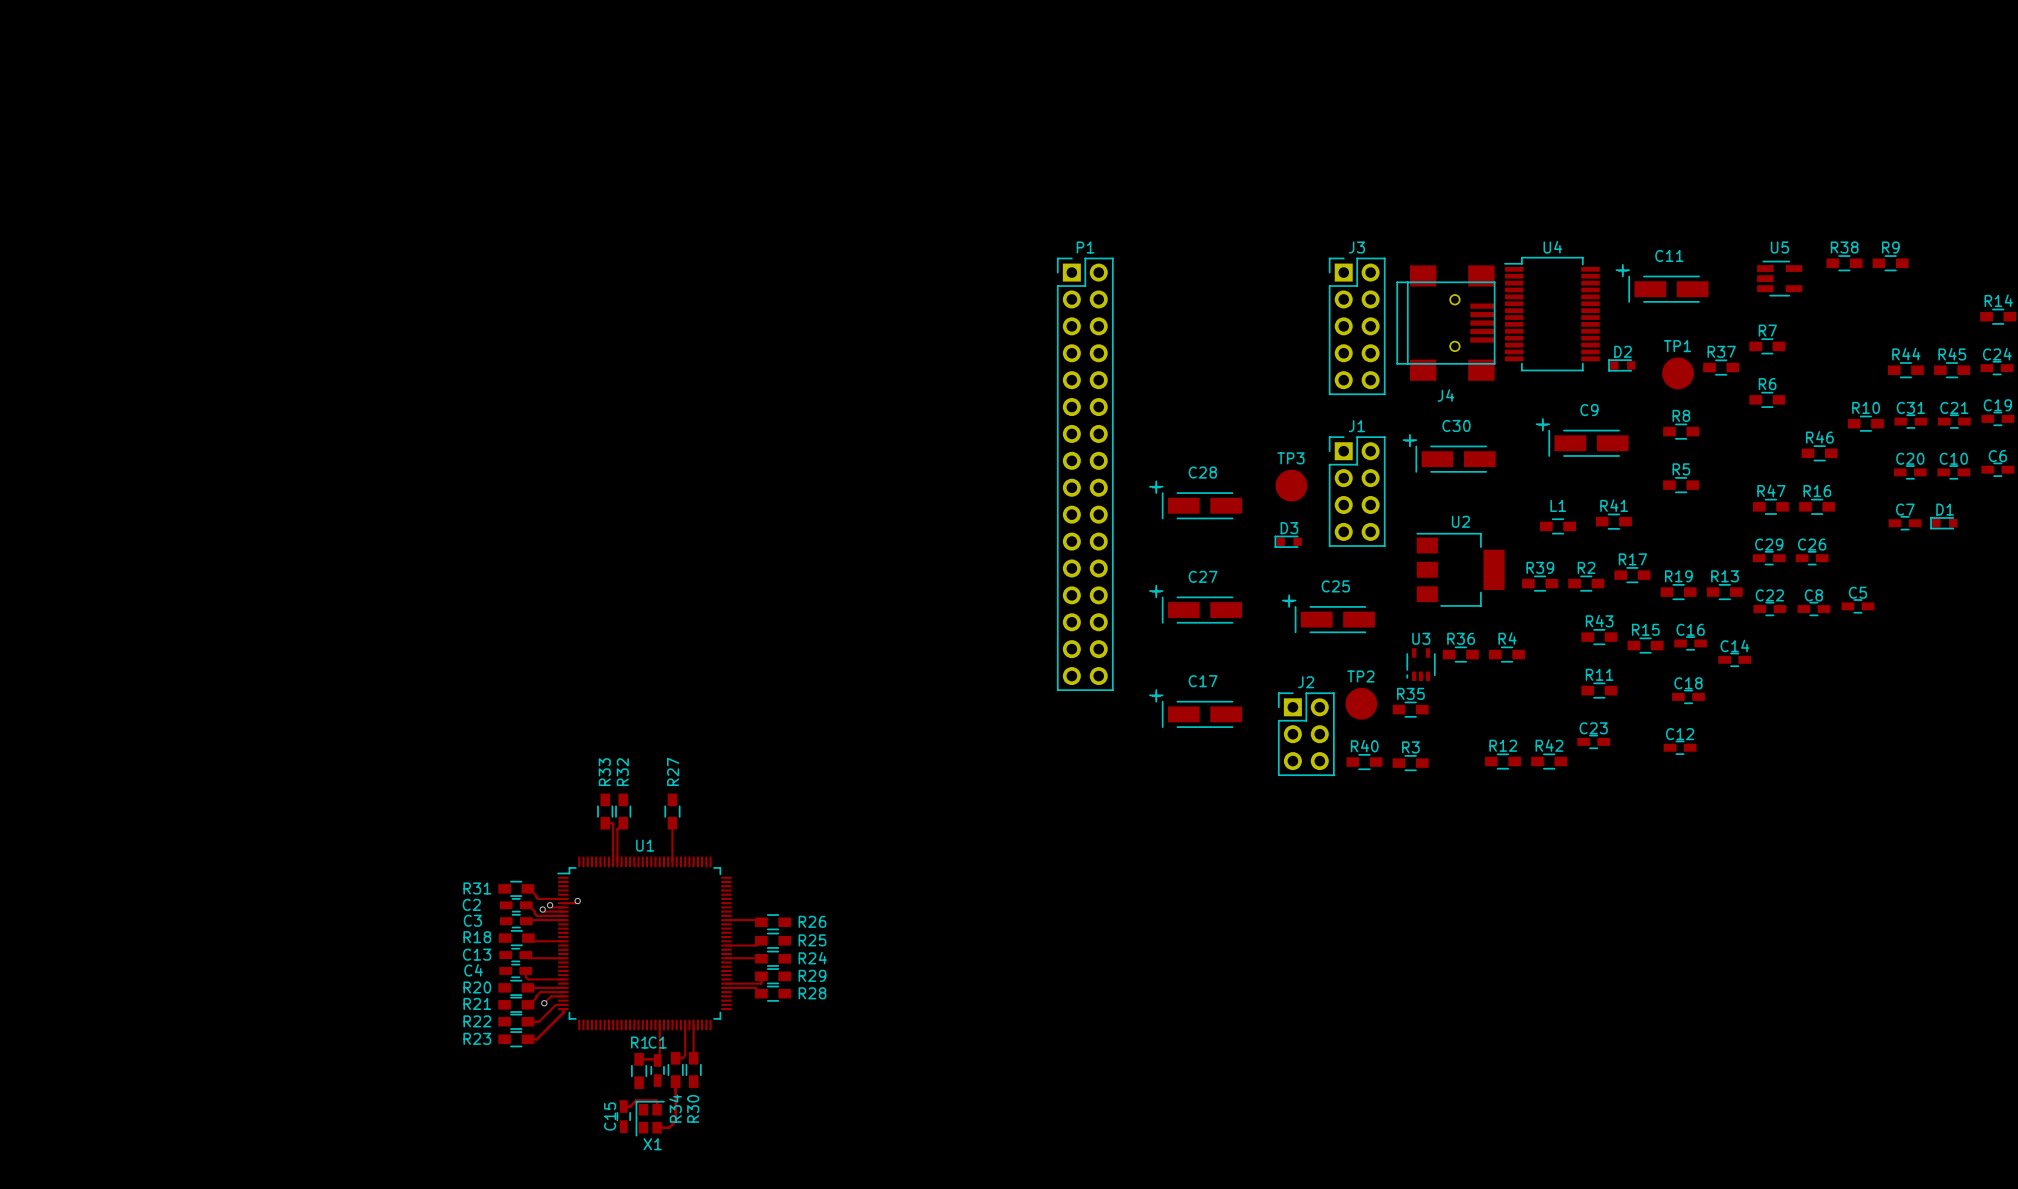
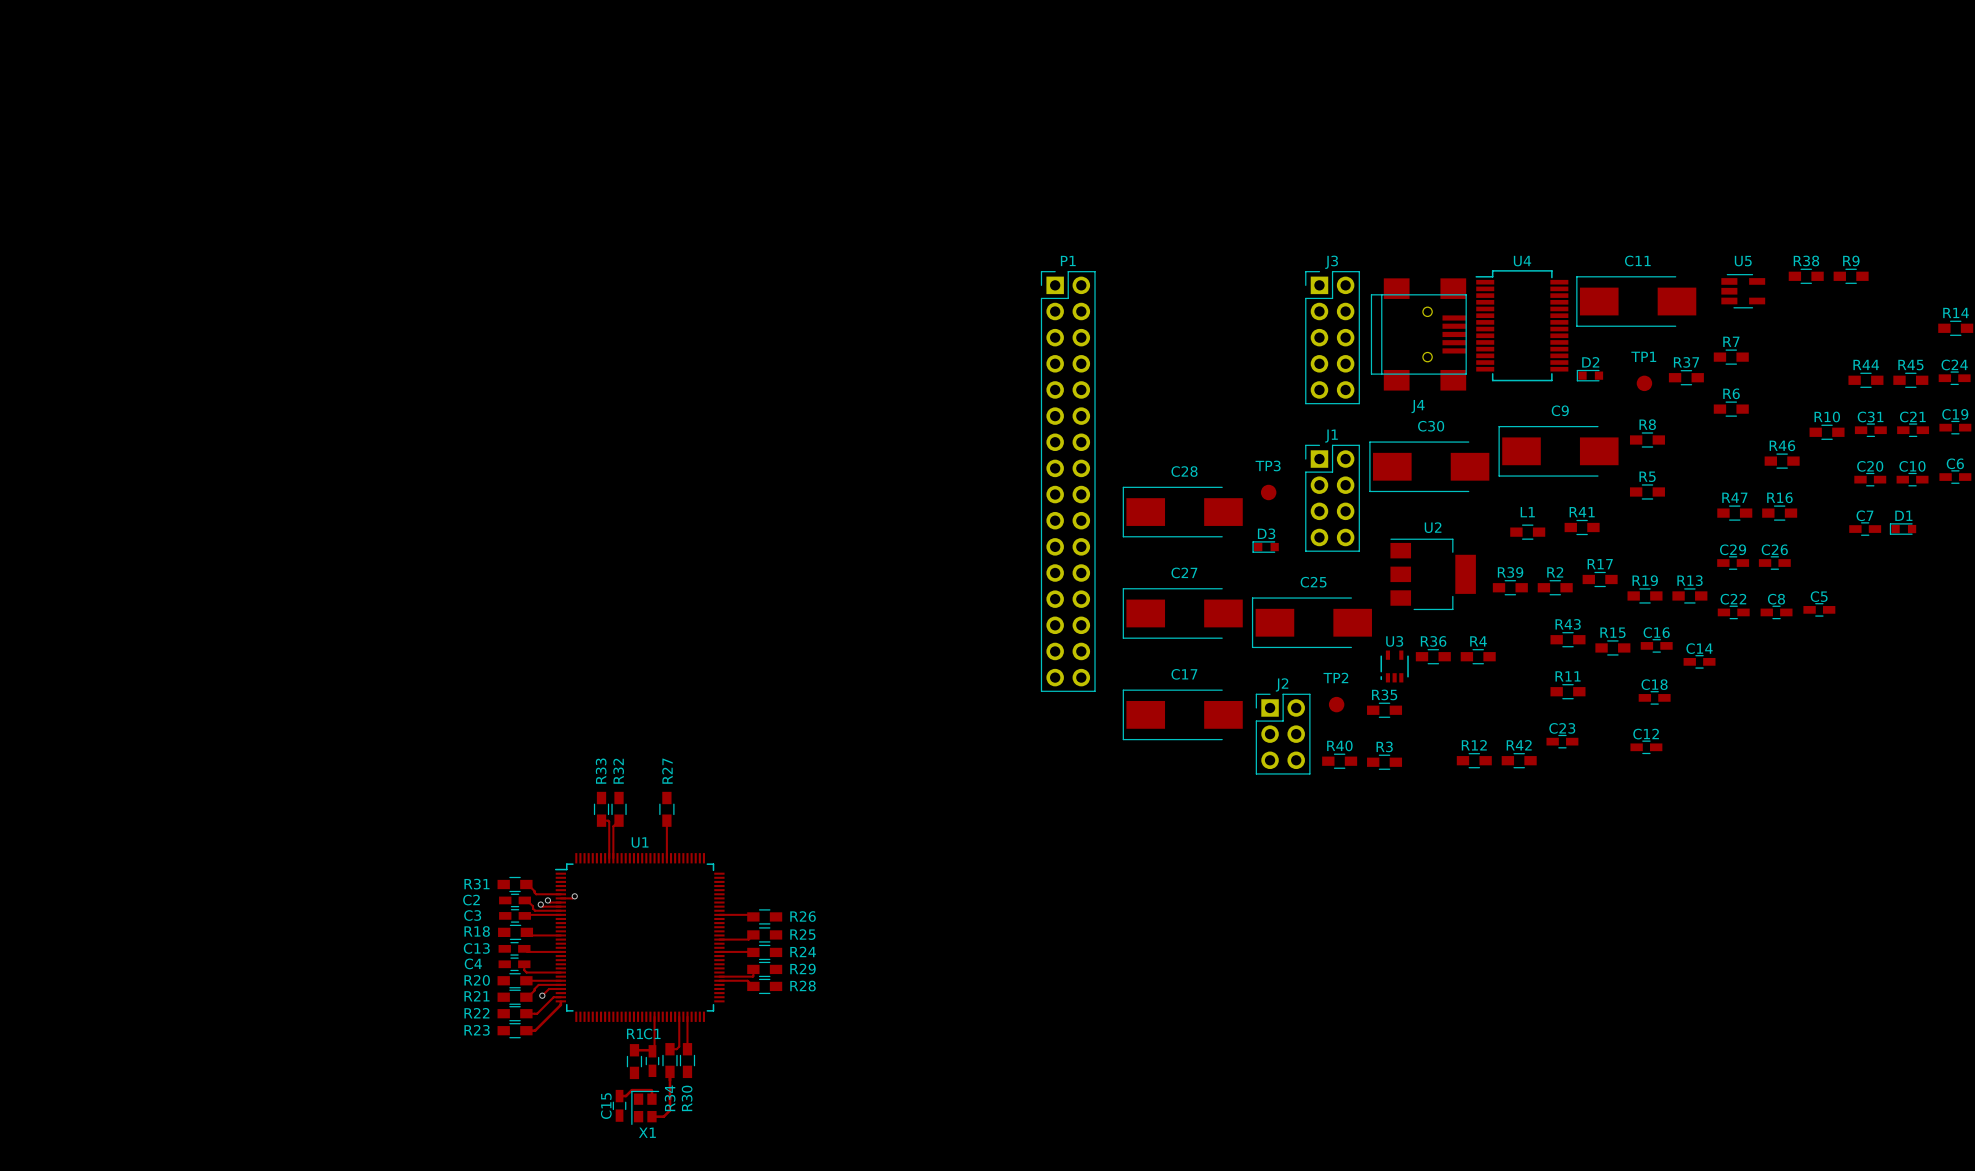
C11 footprint: [1615, 264, 1709, 303] -> [1576, 276, 1697, 327]
TP1 footprint: [1662, 357, 1694, 390] -> [1636, 375, 1653, 392]
C9 footprint: [1535, 418, 1629, 457] -> [1498, 425, 1619, 477]
C30 footprint: [1402, 434, 1496, 473] -> [1369, 441, 1490, 493]
TP3 footprint: [1275, 469, 1308, 502] -> [1260, 484, 1277, 501]
C28 footprint: [1149, 480, 1243, 520] -> [1122, 486, 1243, 538]
C27 footprint: [1149, 584, 1243, 624] -> [1122, 588, 1243, 639]
C25 footprint: [1282, 594, 1375, 634] -> [1251, 597, 1372, 649]
TP2 footprint: [1345, 687, 1378, 720] -> [1328, 696, 1345, 713]
C17 footprint: [1149, 689, 1243, 728] -> [1122, 689, 1243, 741]

